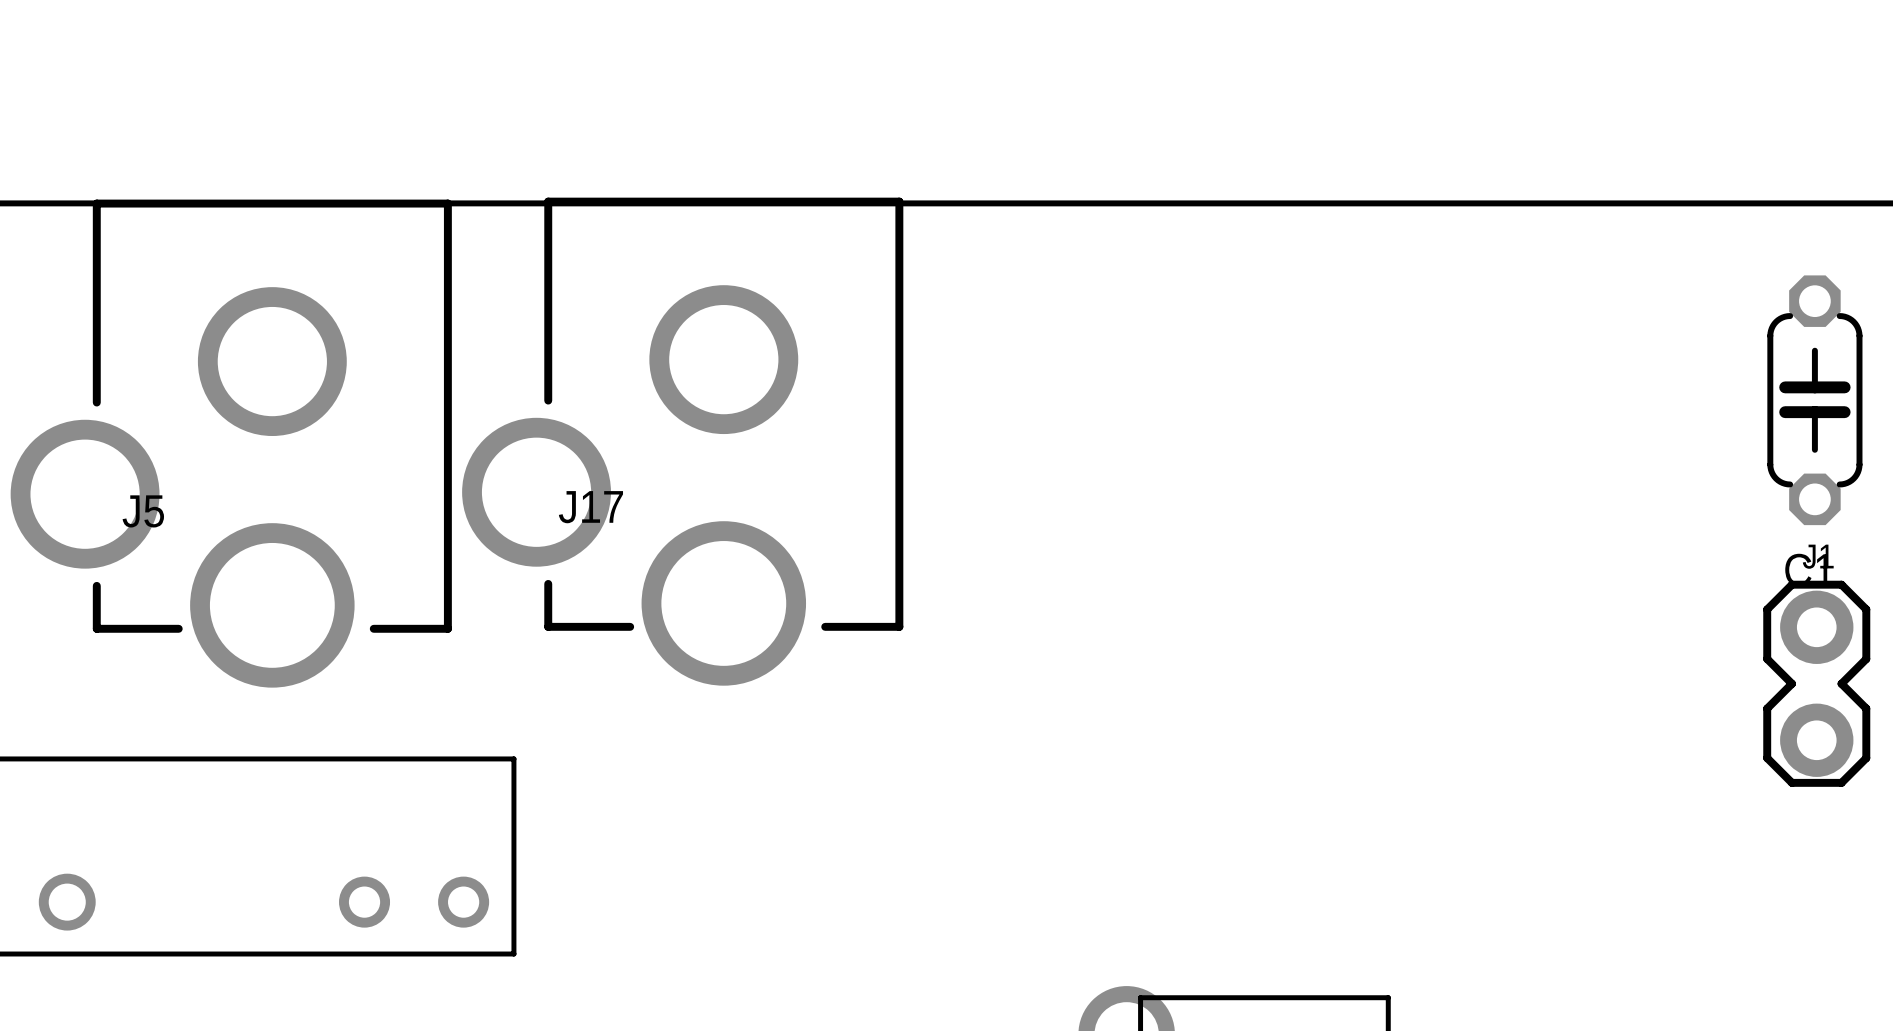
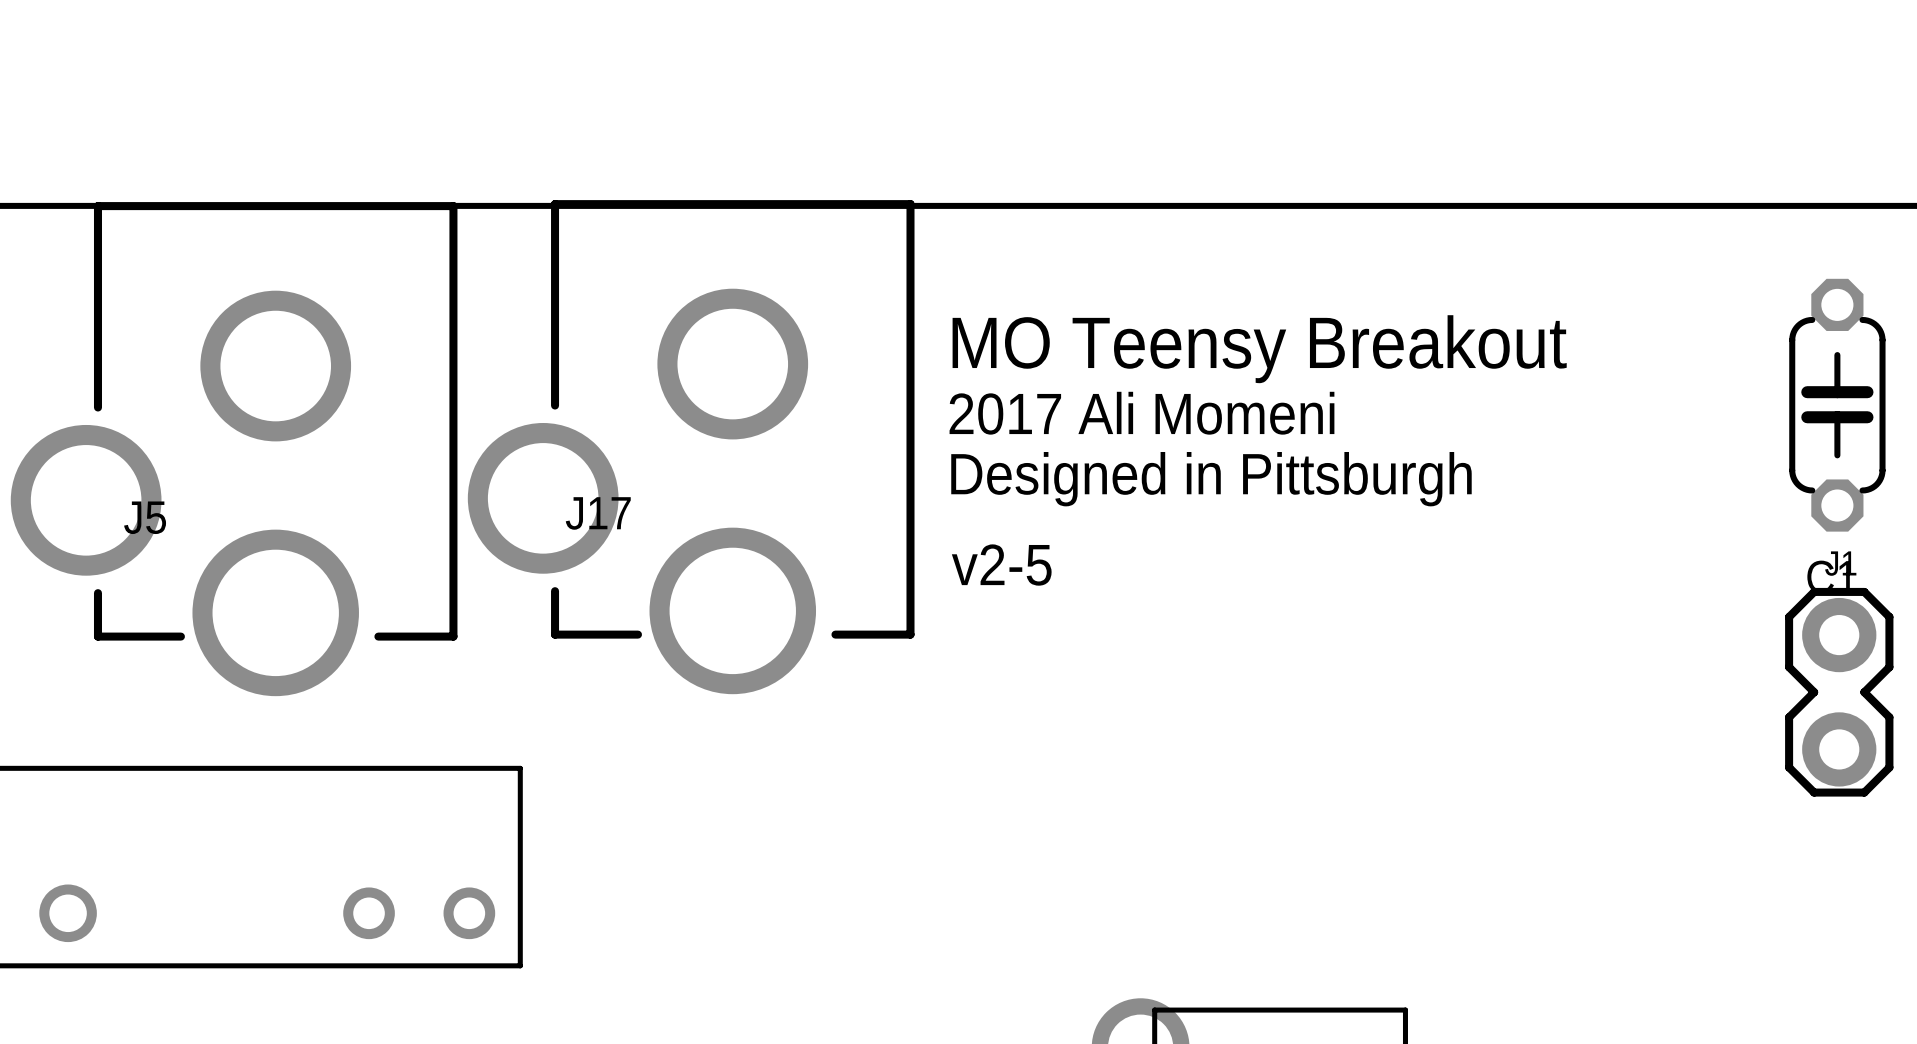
text: none -> MO Teensy Breakout (1259, 349)
text: none -> 2017 Ali Momeni (1141, 413)
text: none -> Designed in Pittsburgh (1211, 479)
text: none -> v2-5 (1001, 565)

